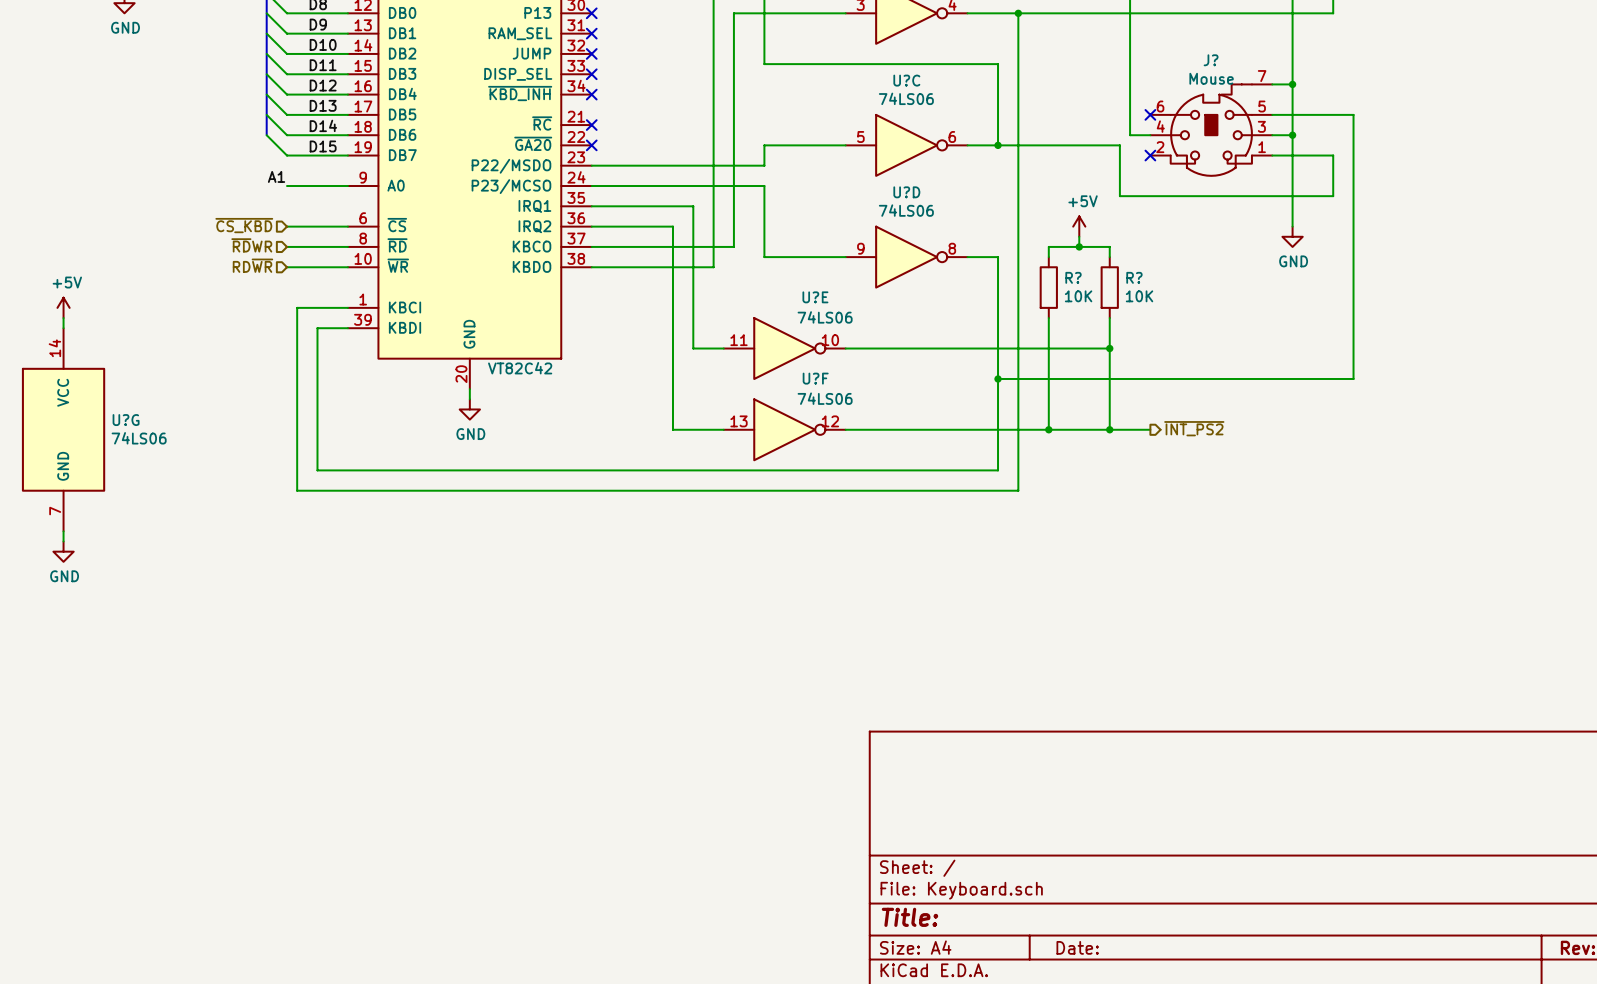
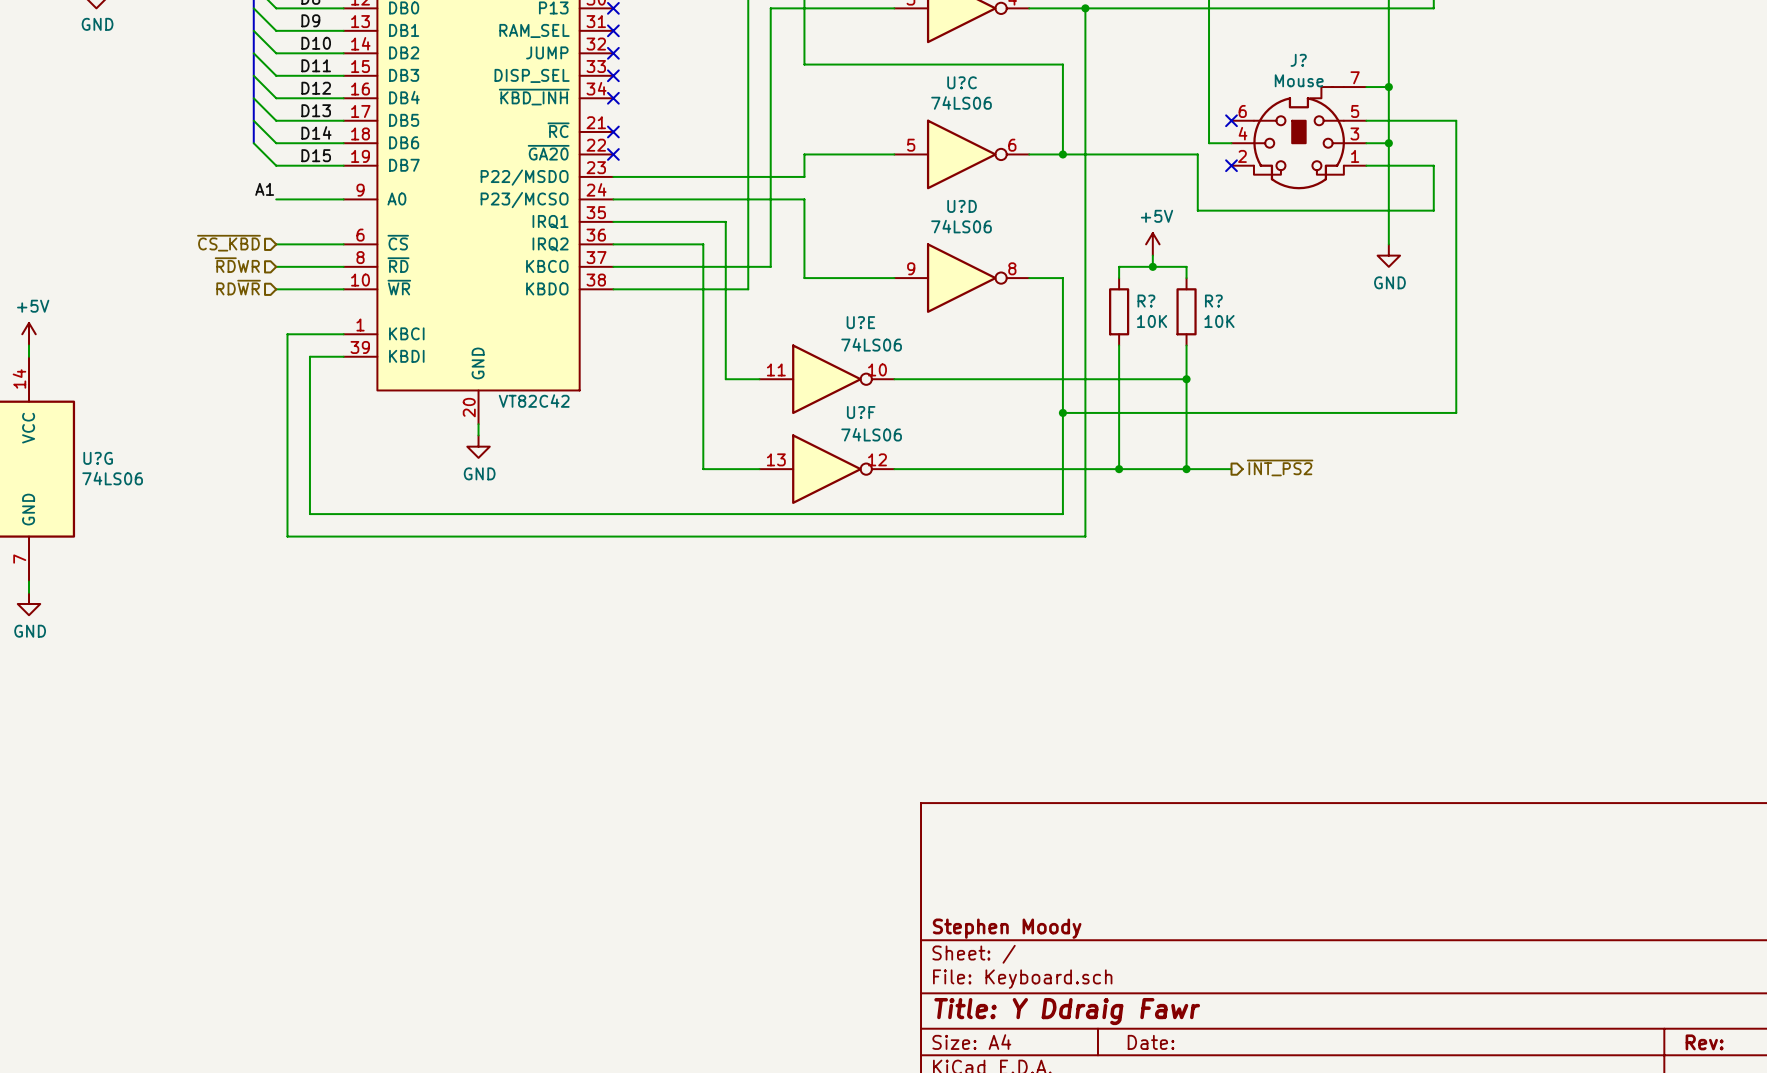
title block: none -> Stephen Moody (1007, 928)
title block: Title: (909, 917) -> Title: Y Ddraig Fawr (1067, 1011)

